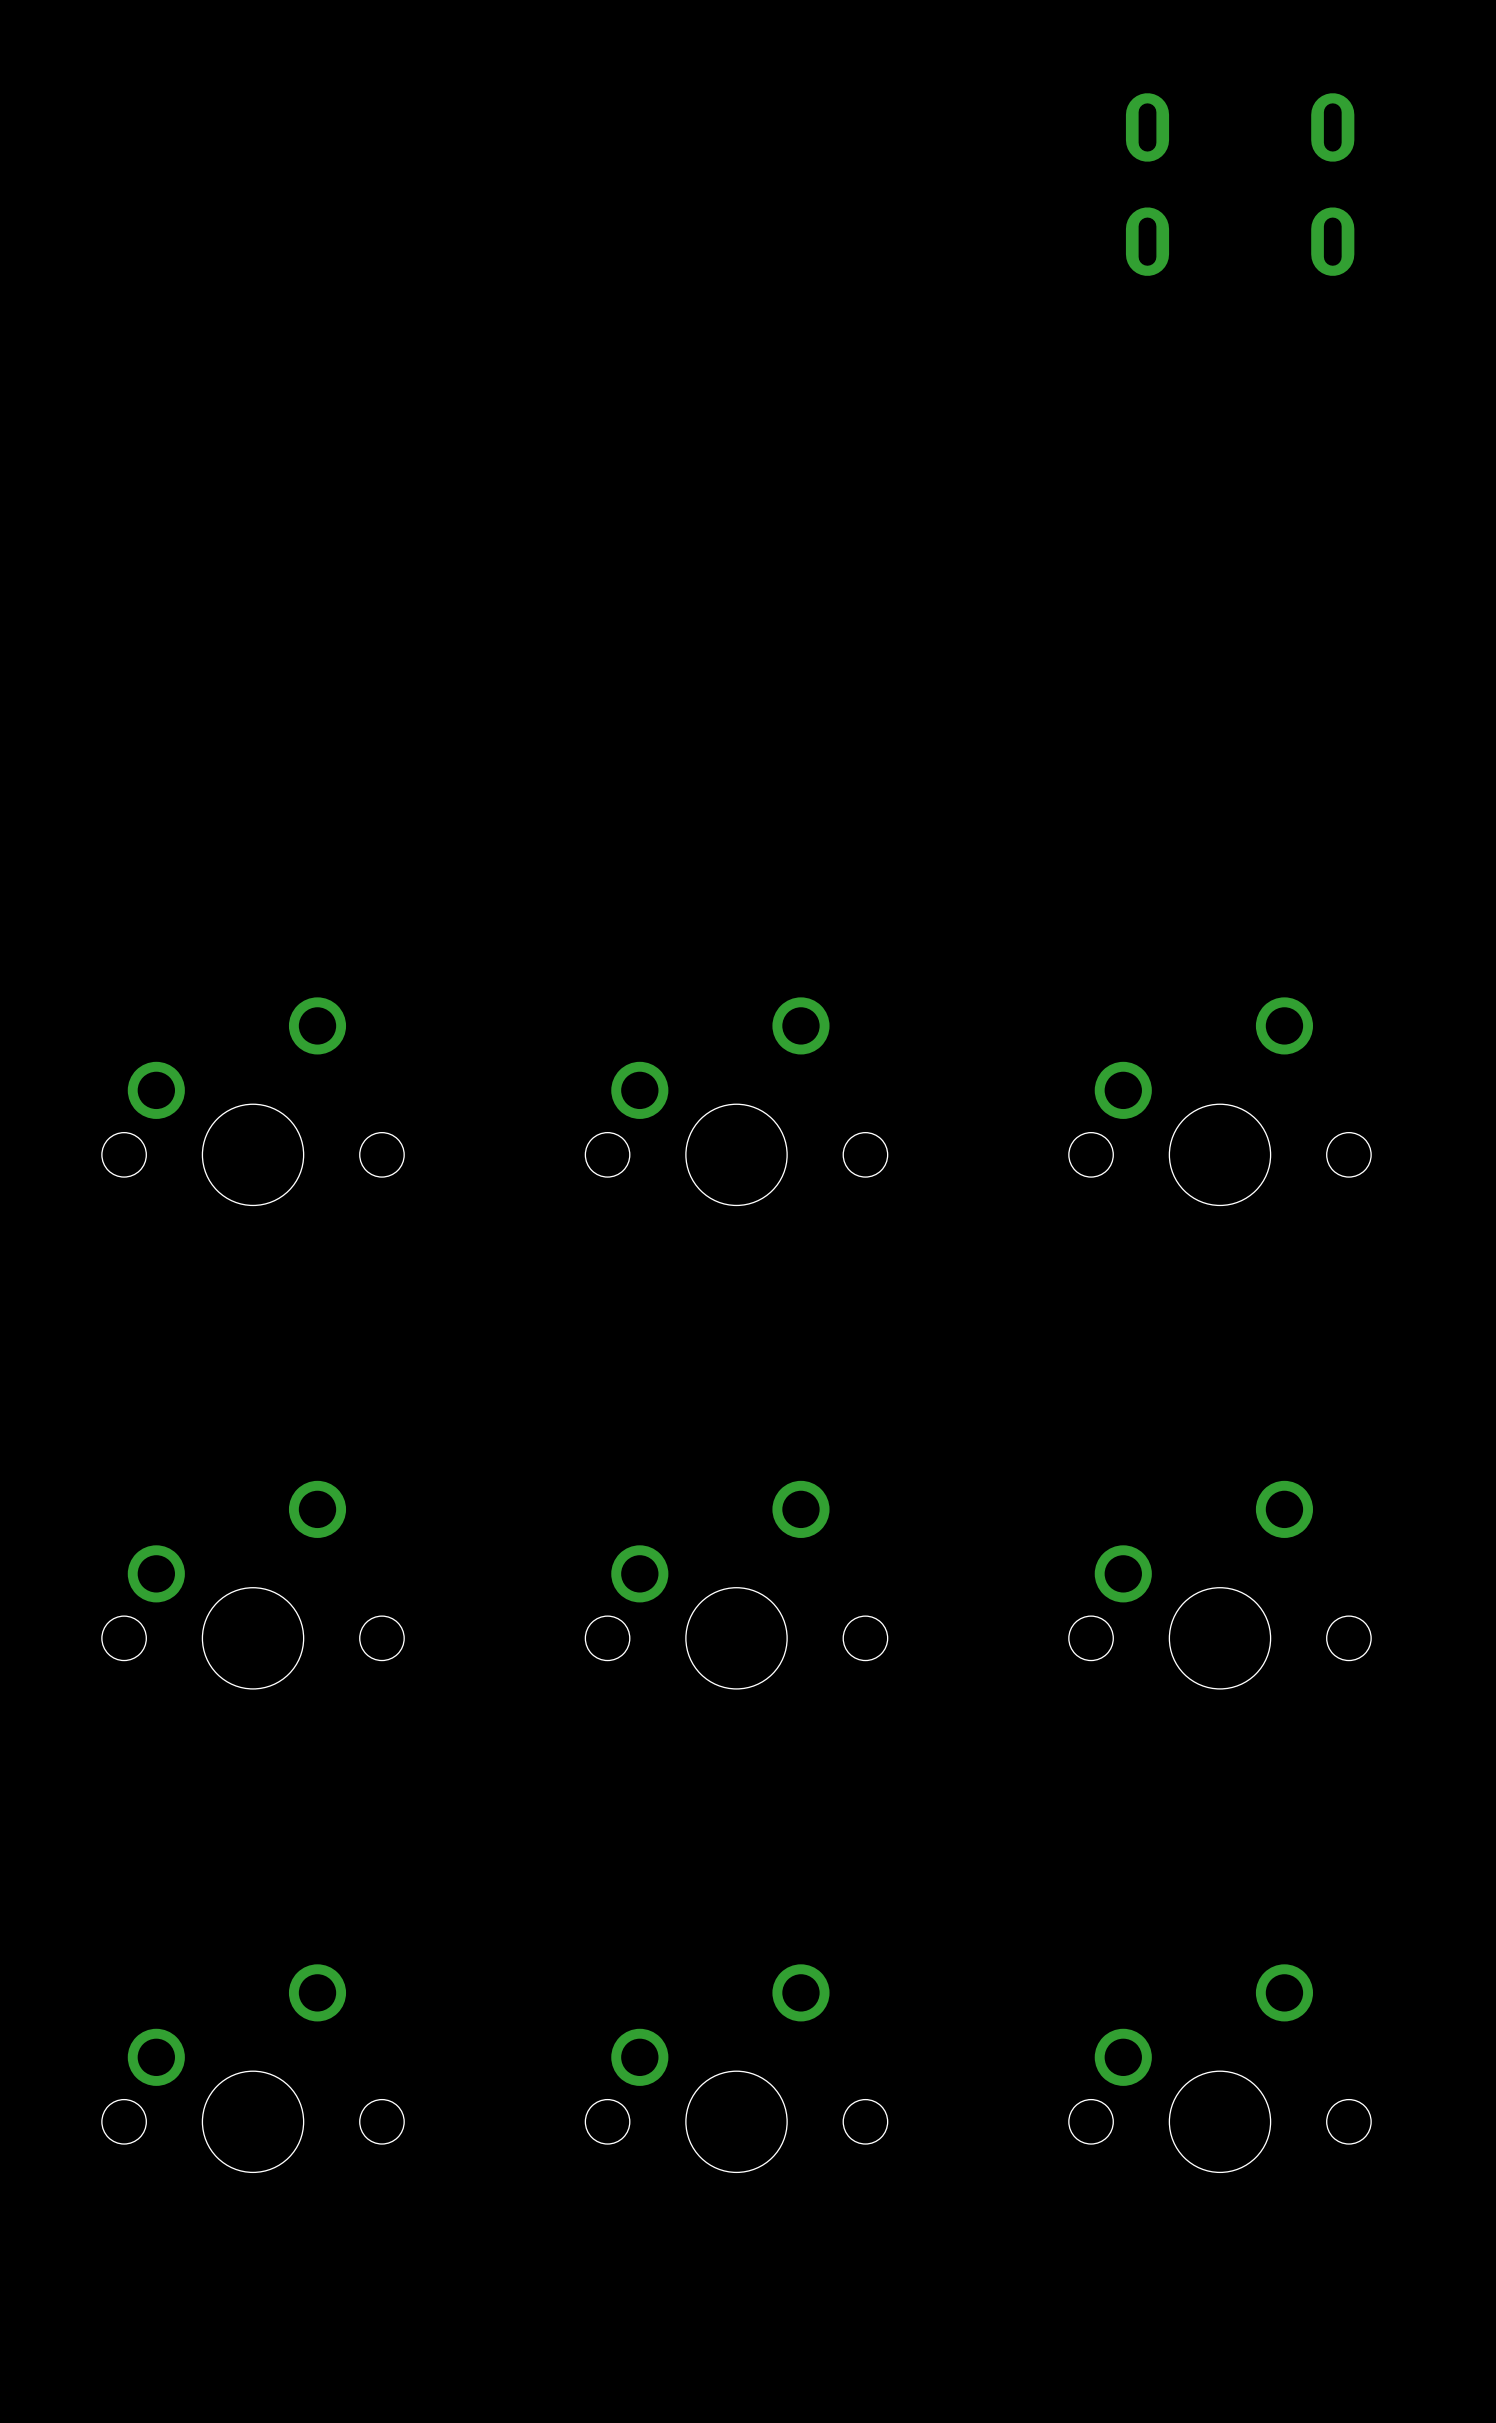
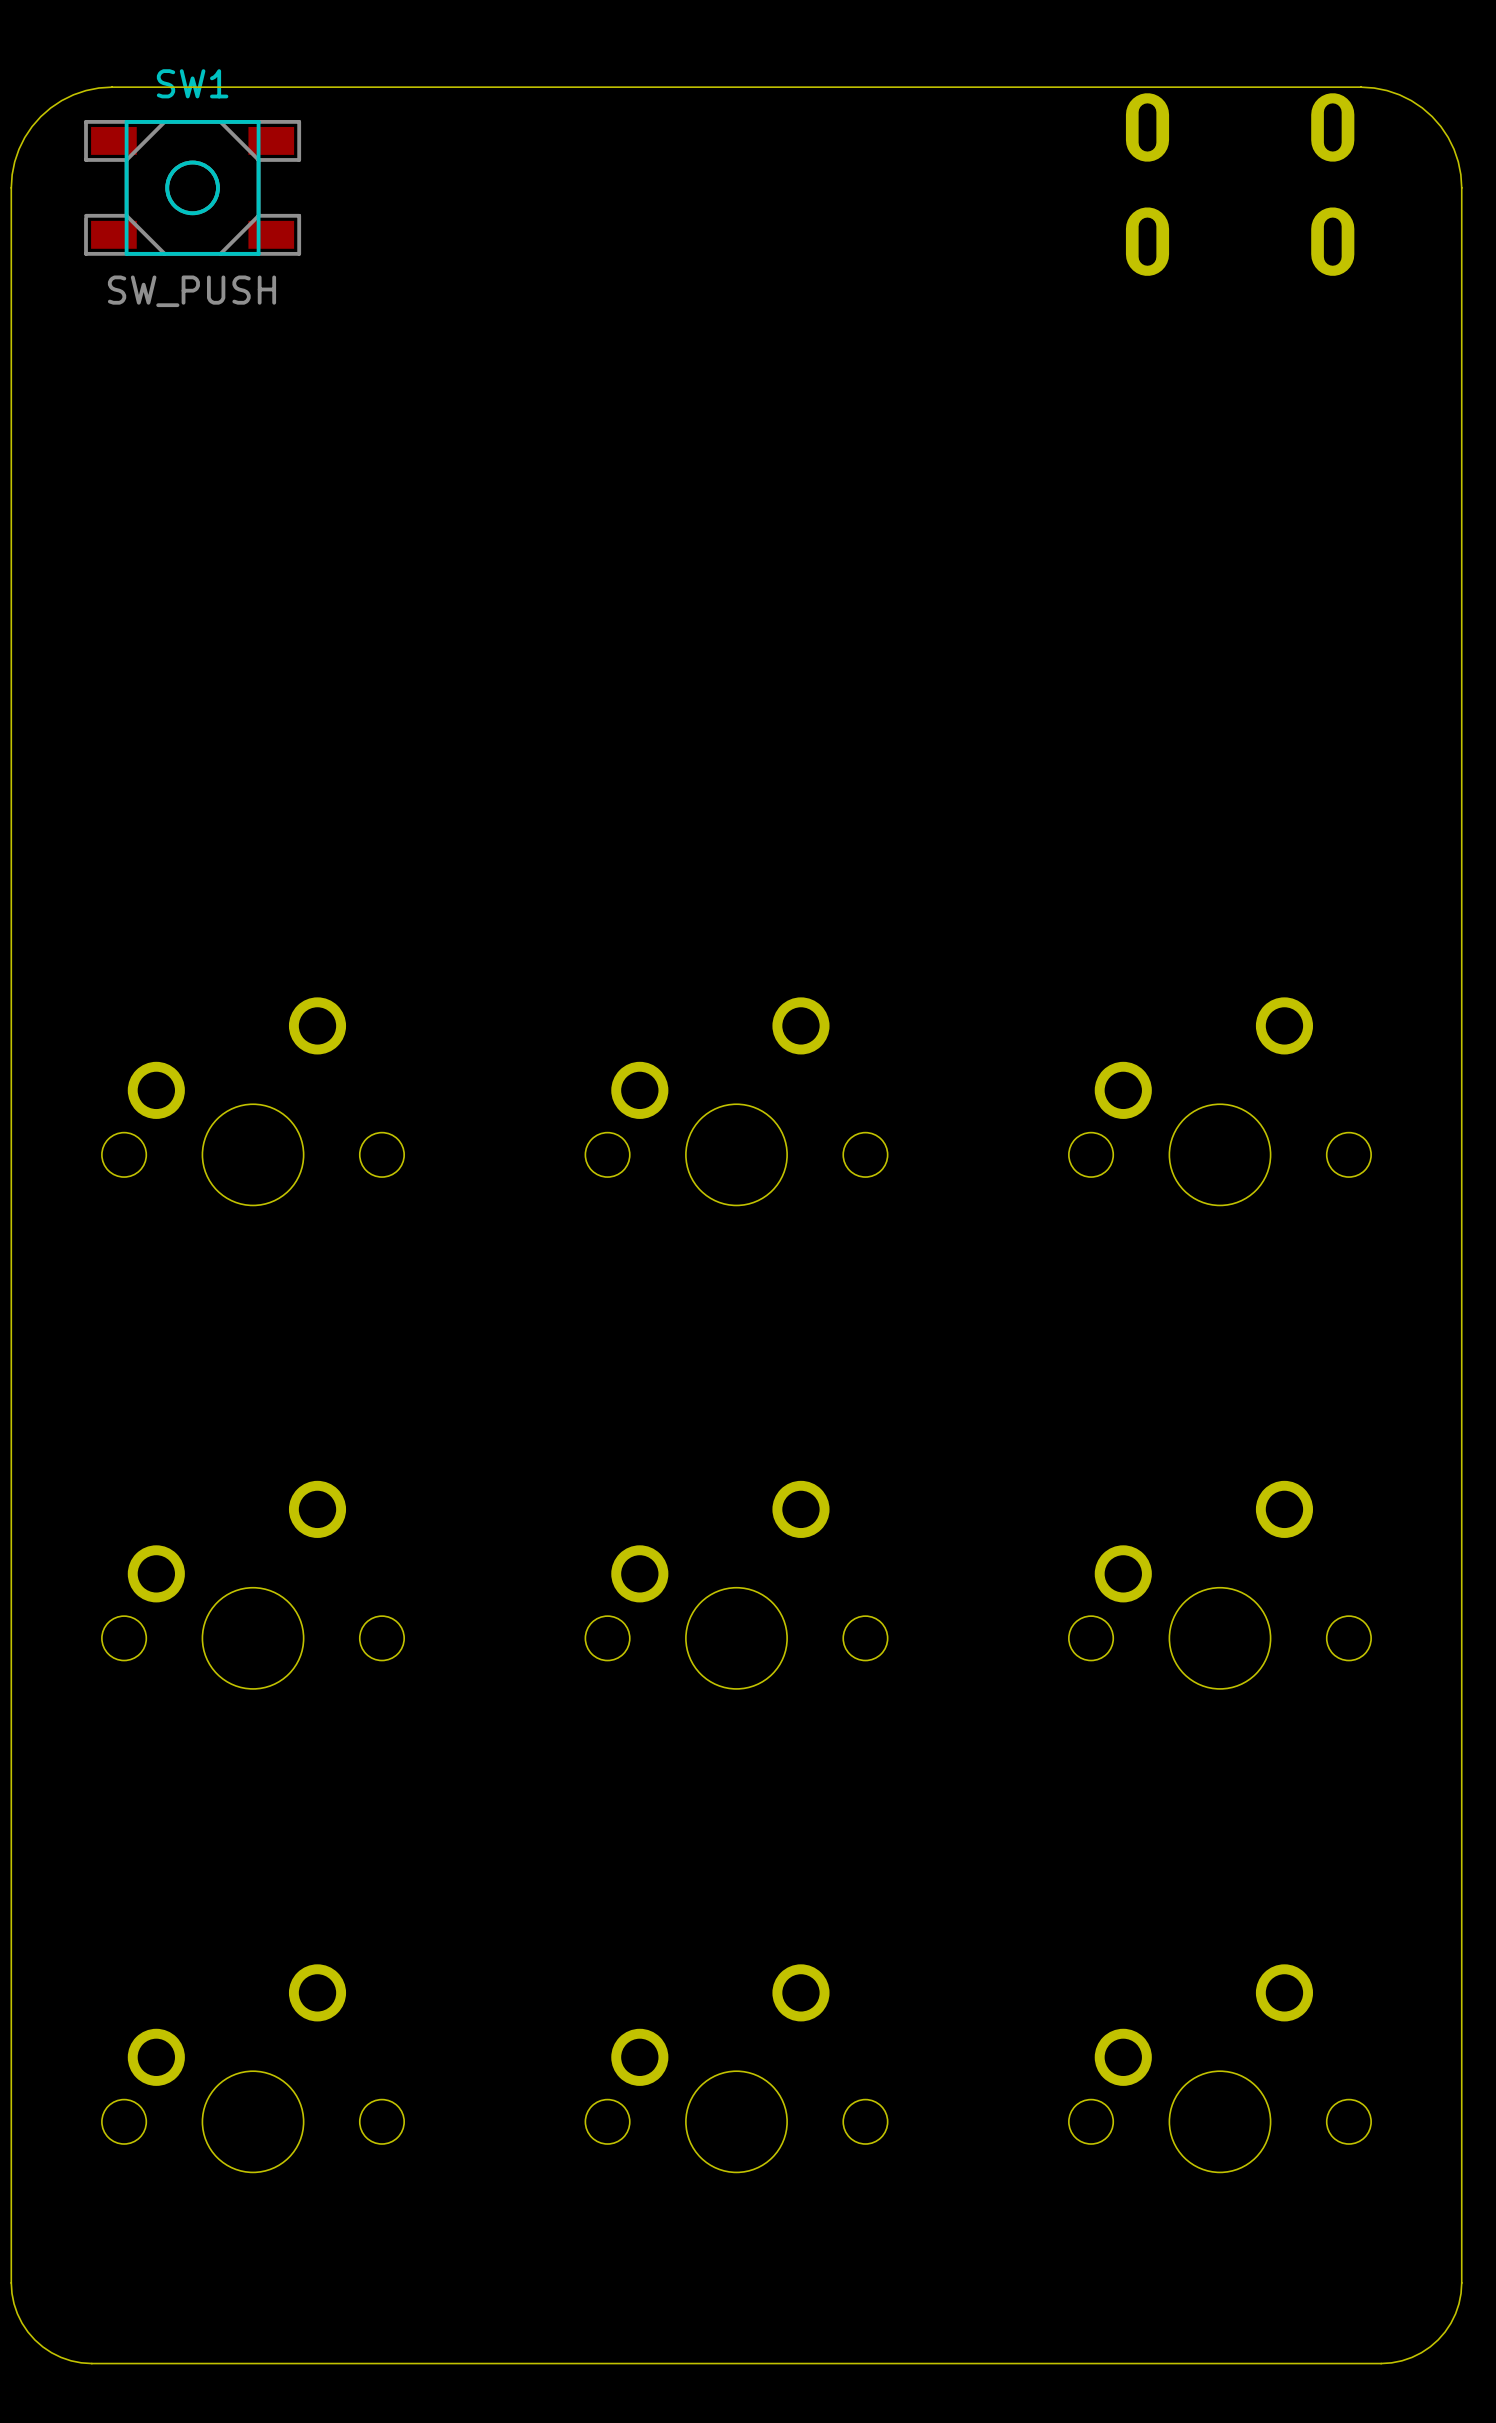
board edge: none -> (112, 87) (1361, 87) (1387, 90) (1411, 100) (1432, 116) (1448, 137) (1458, 161) (1461, 187) (1461, 2282) (1458, 2303) (1450, 2323) (1438, 2339) (1421, 2352) (1402, 2360) (1381, 2363) (91, 2363) (71, 2360) (51, 2352) (34, 2339) (22, 2323) (14, 2303) (11, 2282) (11, 187) (14, 161) (18, 149) (24, 137) (40, 116) (61, 100) (73, 94) (85, 90) (112, 87)
SW1: none -> SW_PUSH (192, 187)

